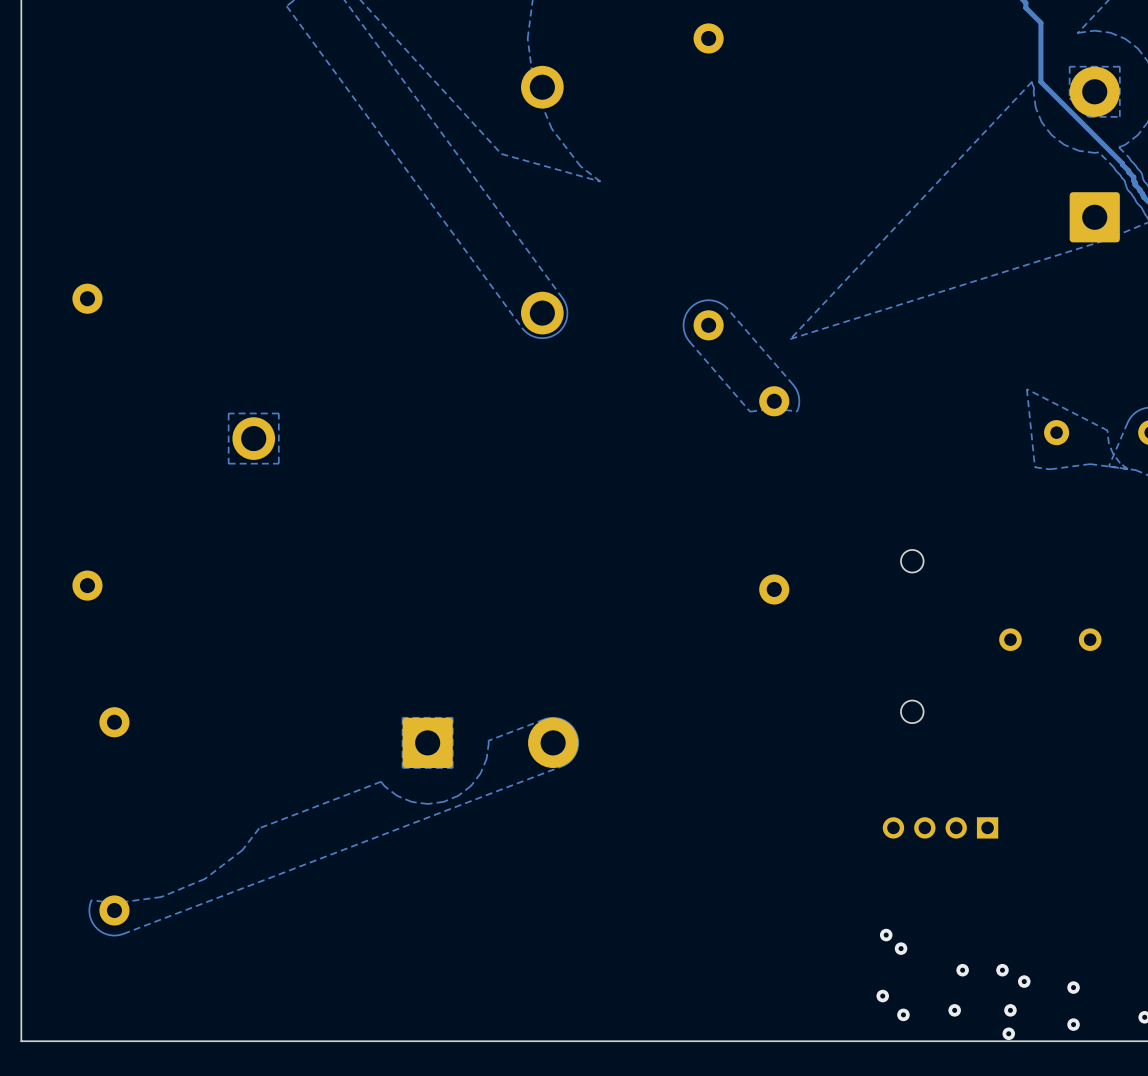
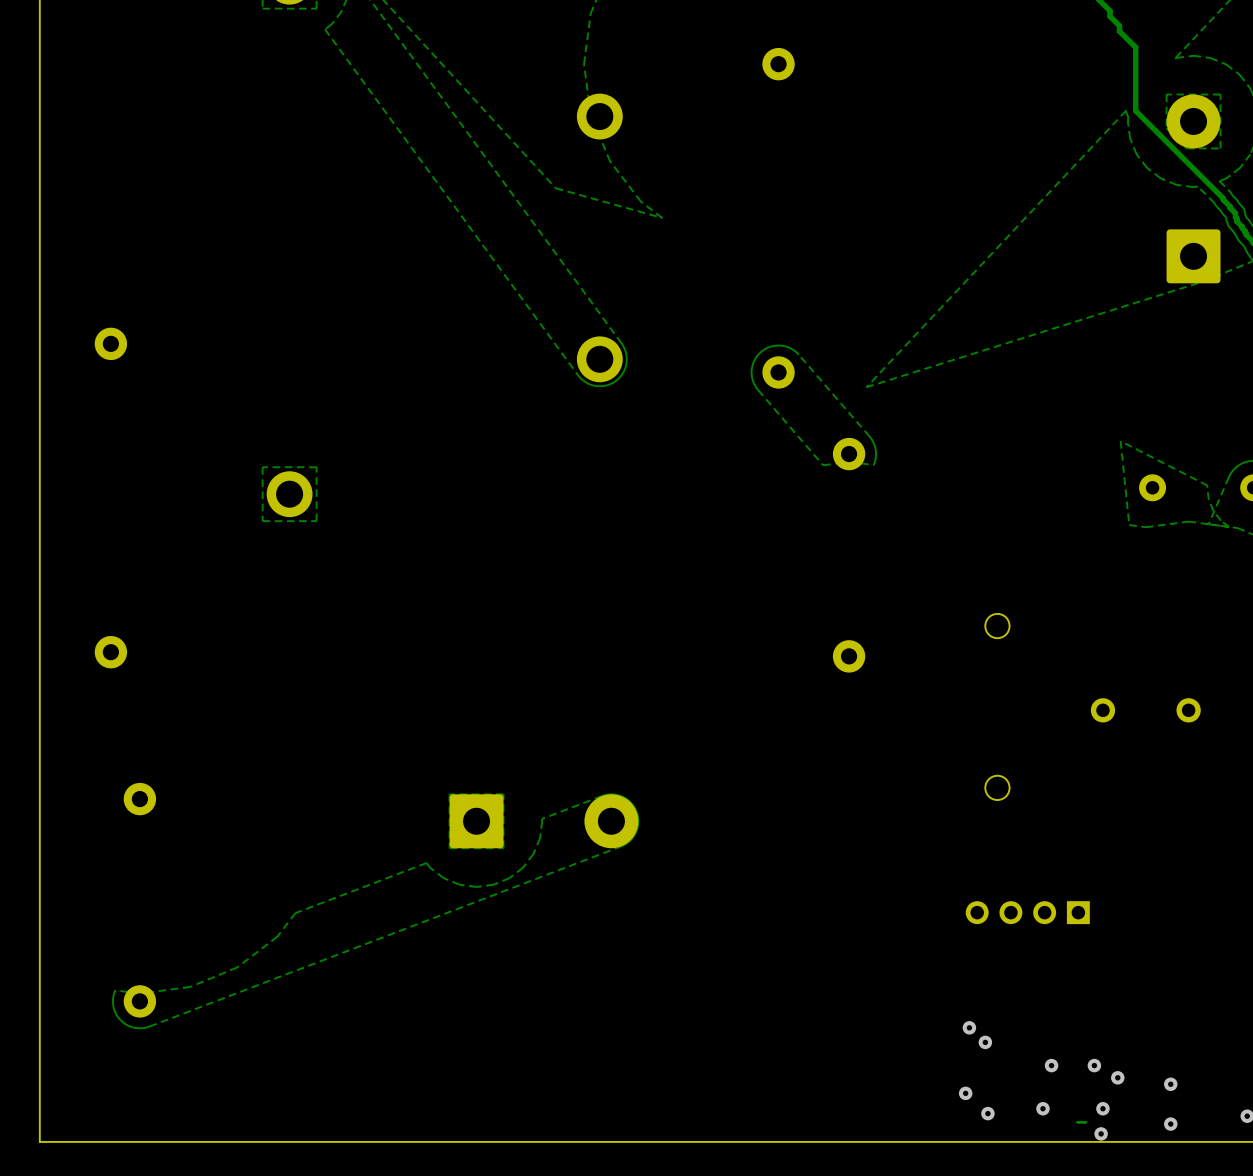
track: none -> (1085, 1122) (1077, 1122)

